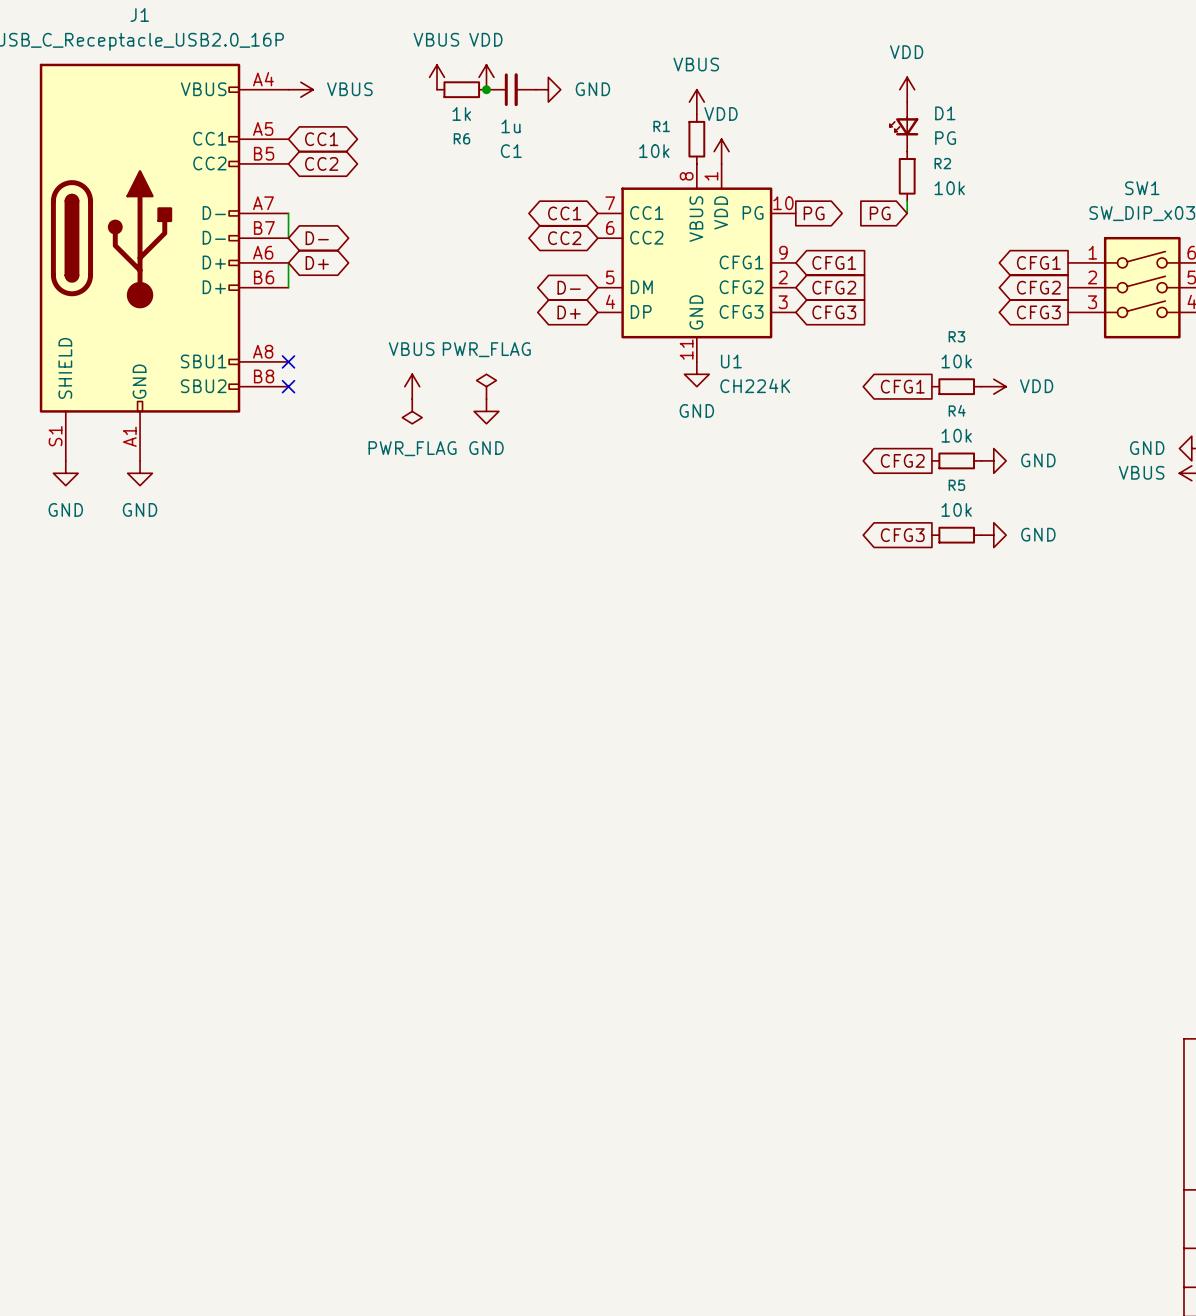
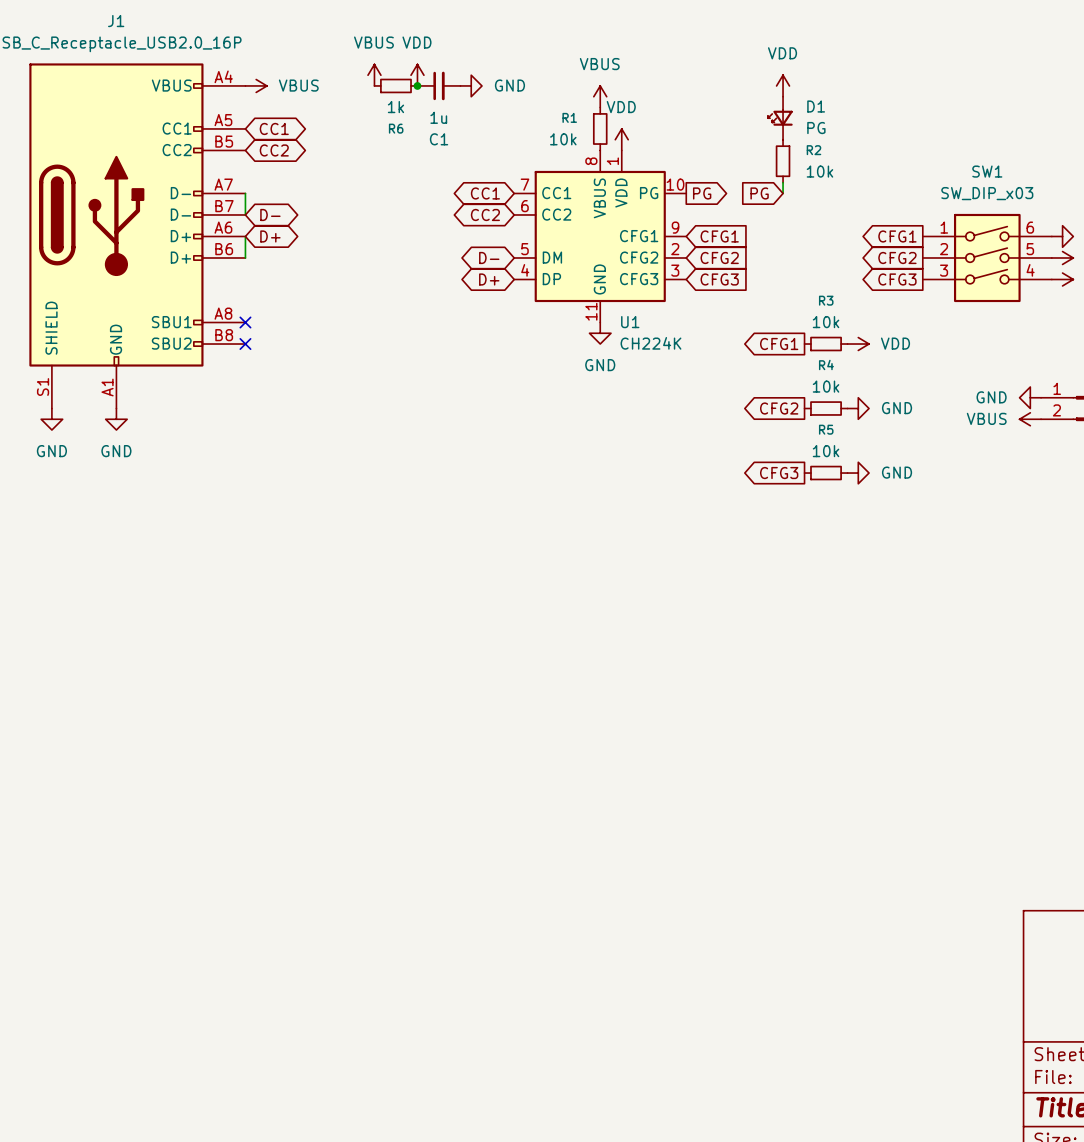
power symbol: VBUS (412, 386) -> none
power symbol: PWR_FLAG (486, 386) -> none
power symbol: PWR_FLAG (412, 411) -> none
power symbol: GND (486, 411) -> none

